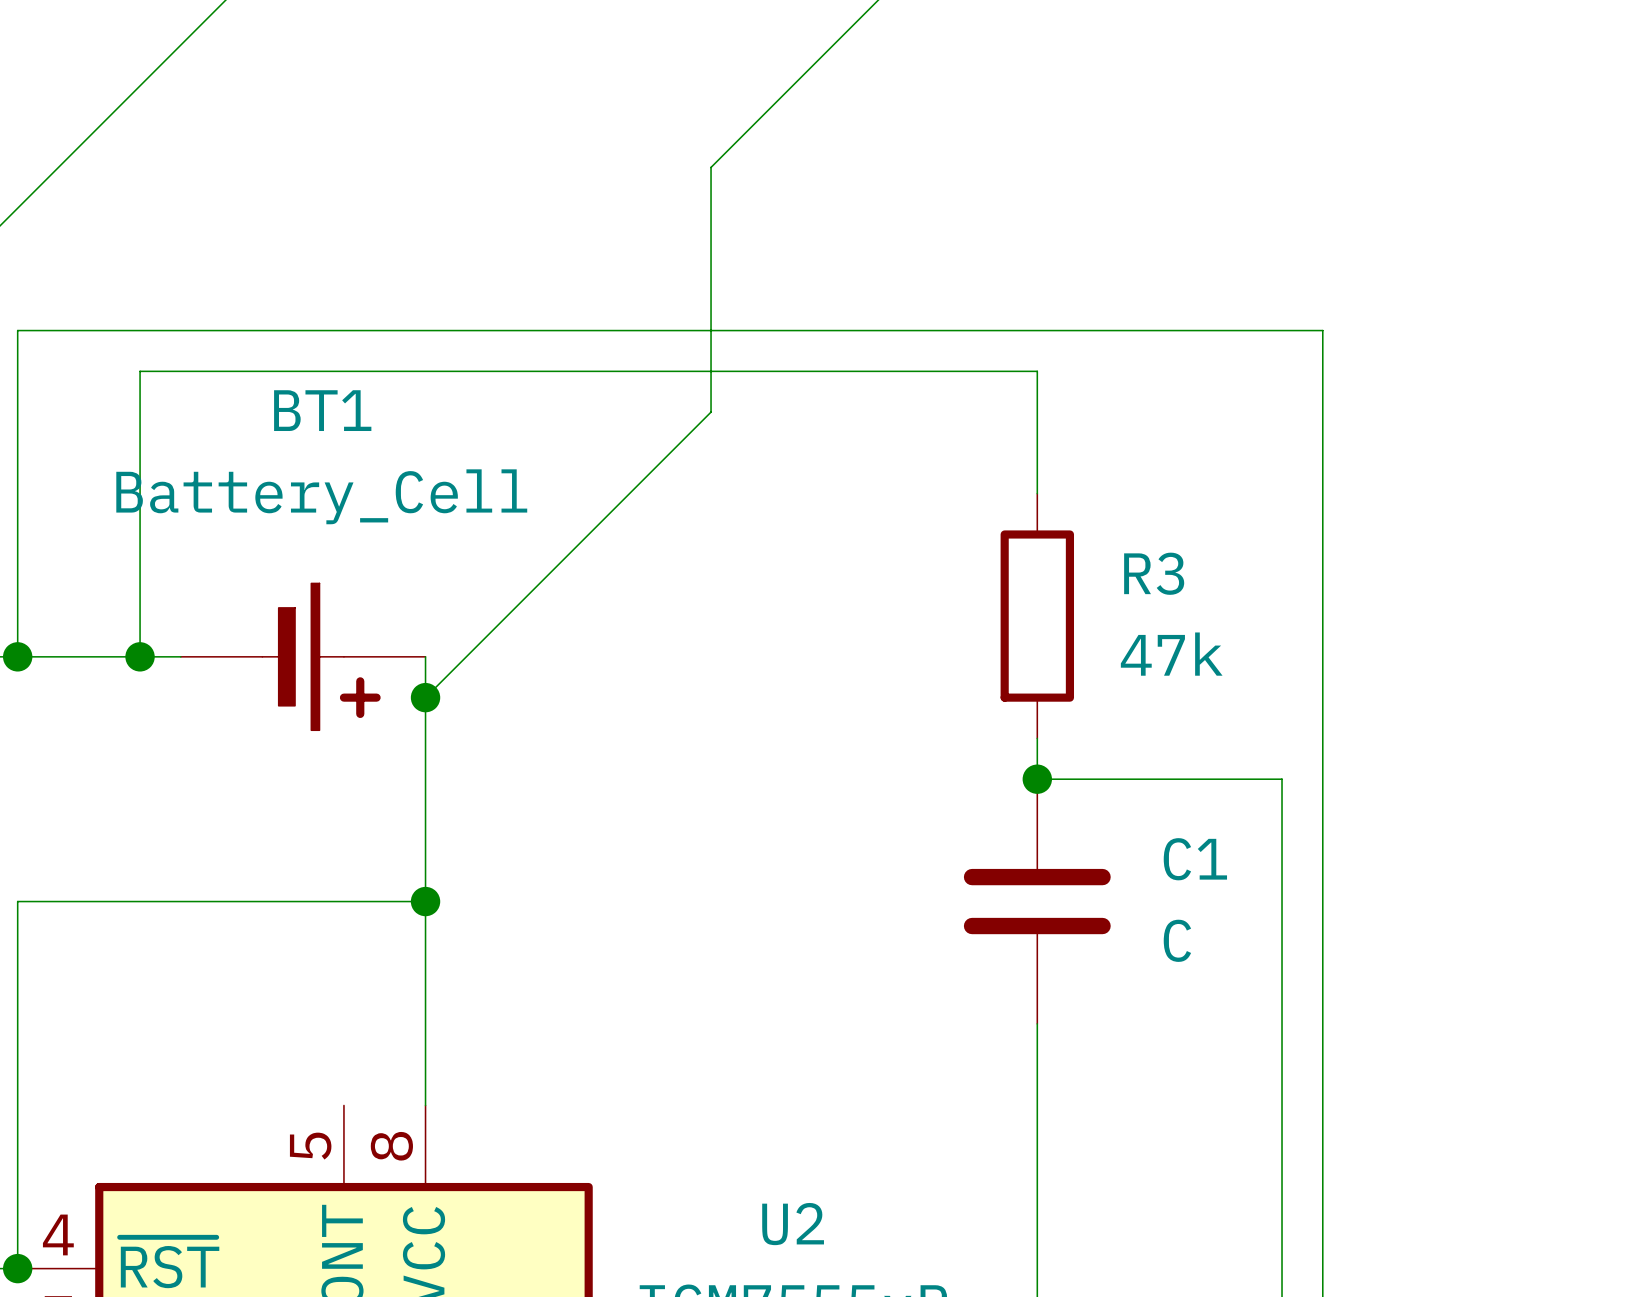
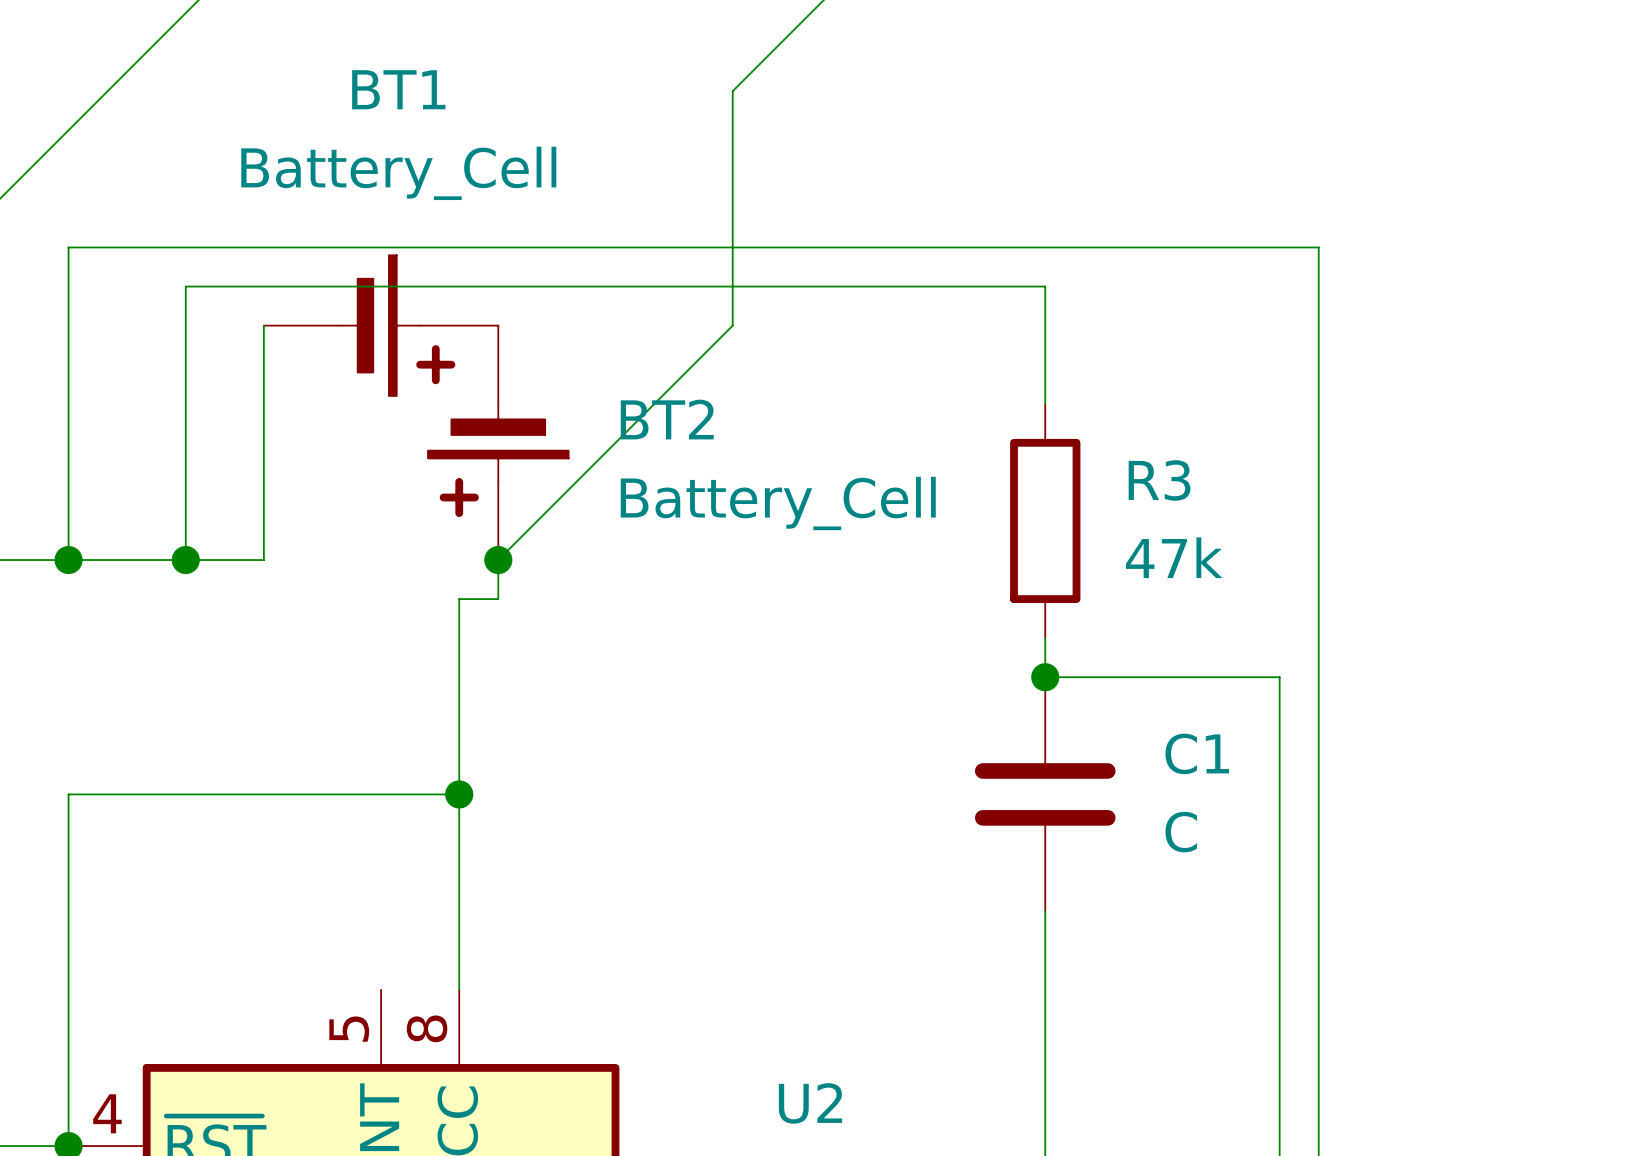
wire: none -> (263, 325) (263, 560) (224, 560)
BT2: none -> Battery_Cell (498, 442)
BT1 position: (303, 656) -> (381, 325)
wire: (425, 656) (425, 697) (466, 656) -> (459, 599) (498, 599) (498, 560)
junction position: (425, 697) -> (498, 560)

